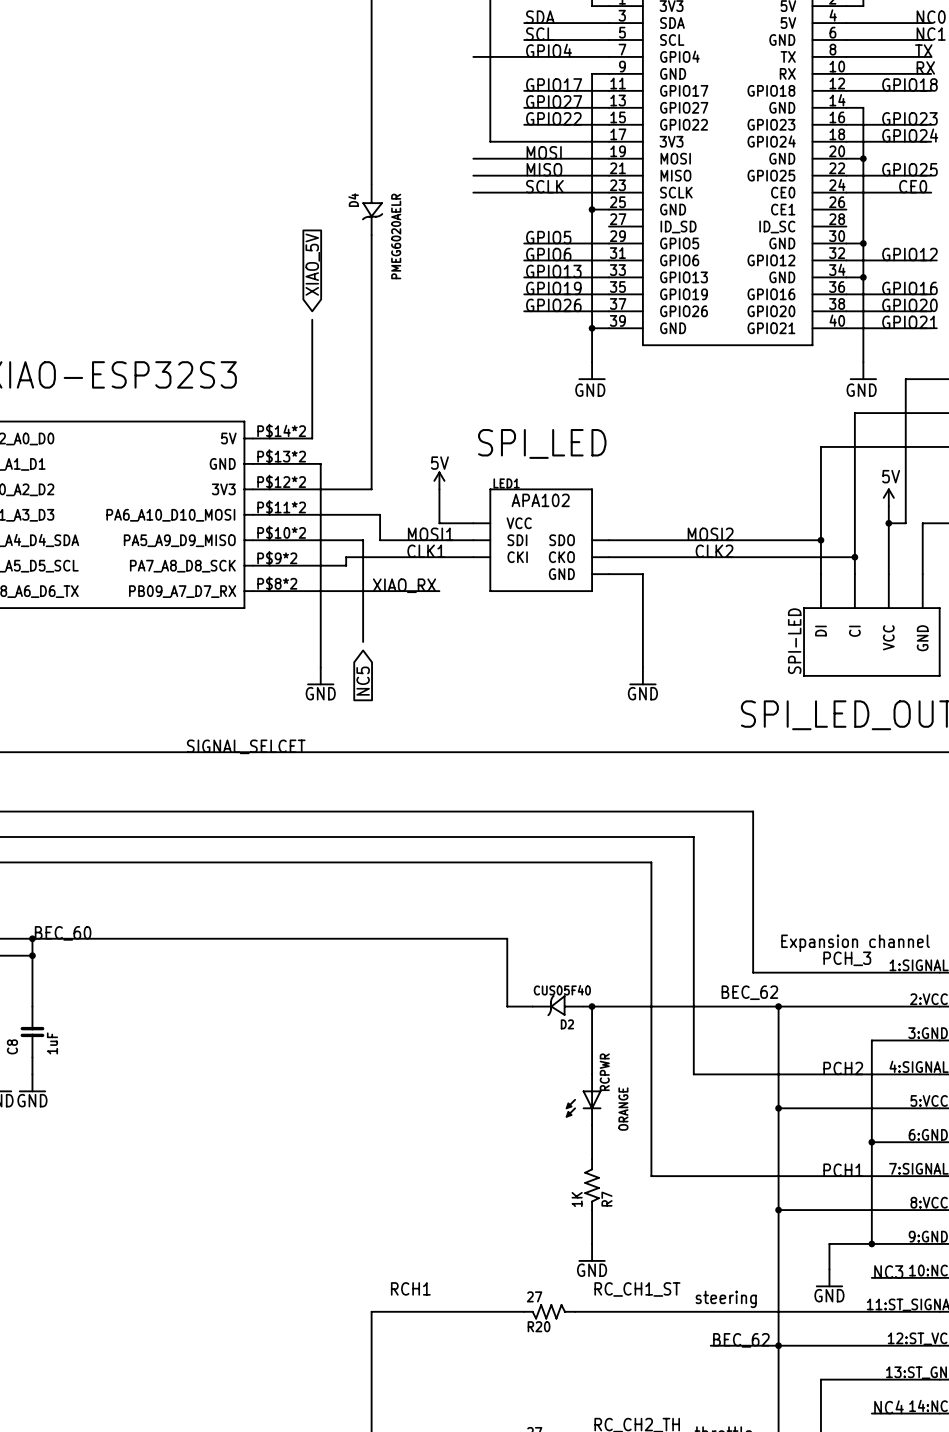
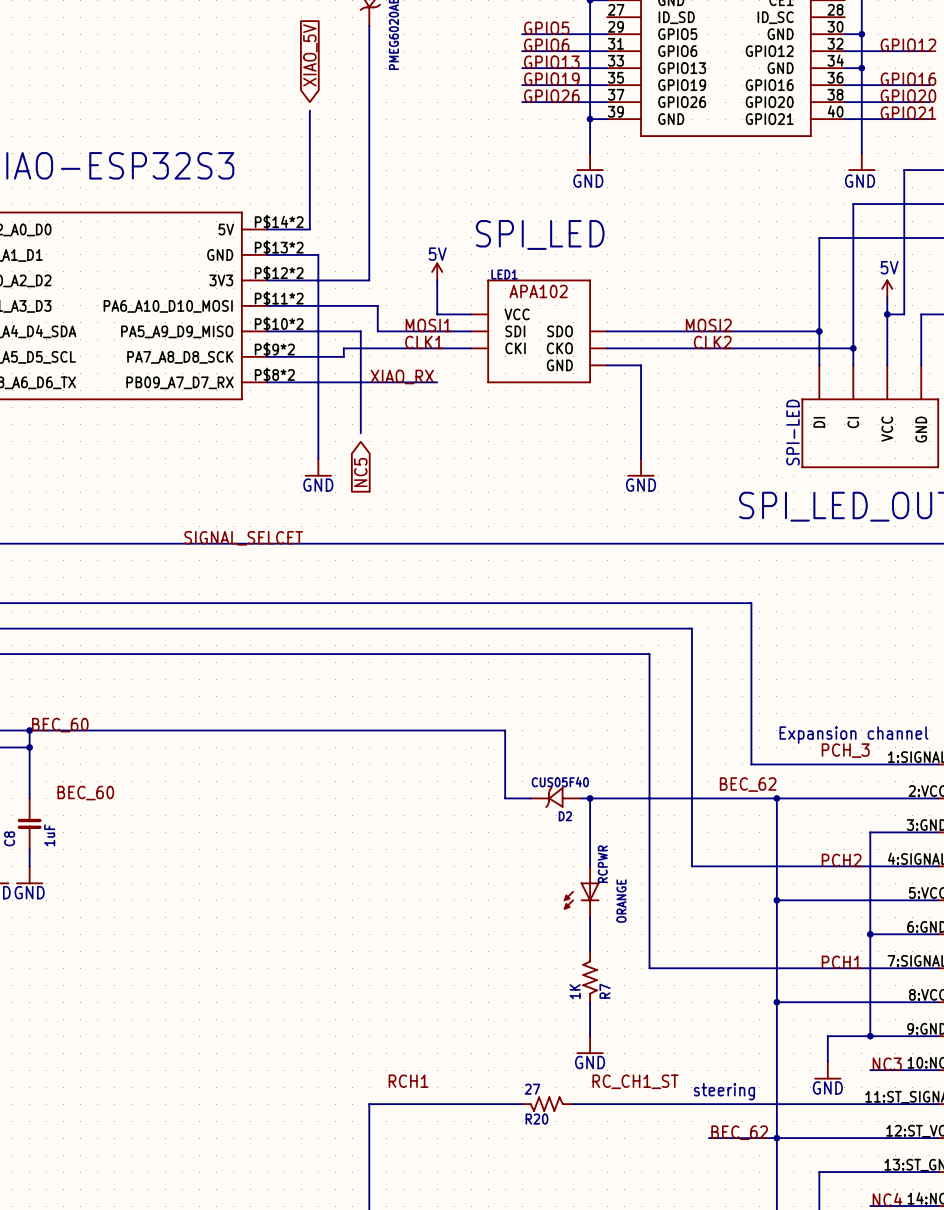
label: none -> BEC_60 (85, 793)

